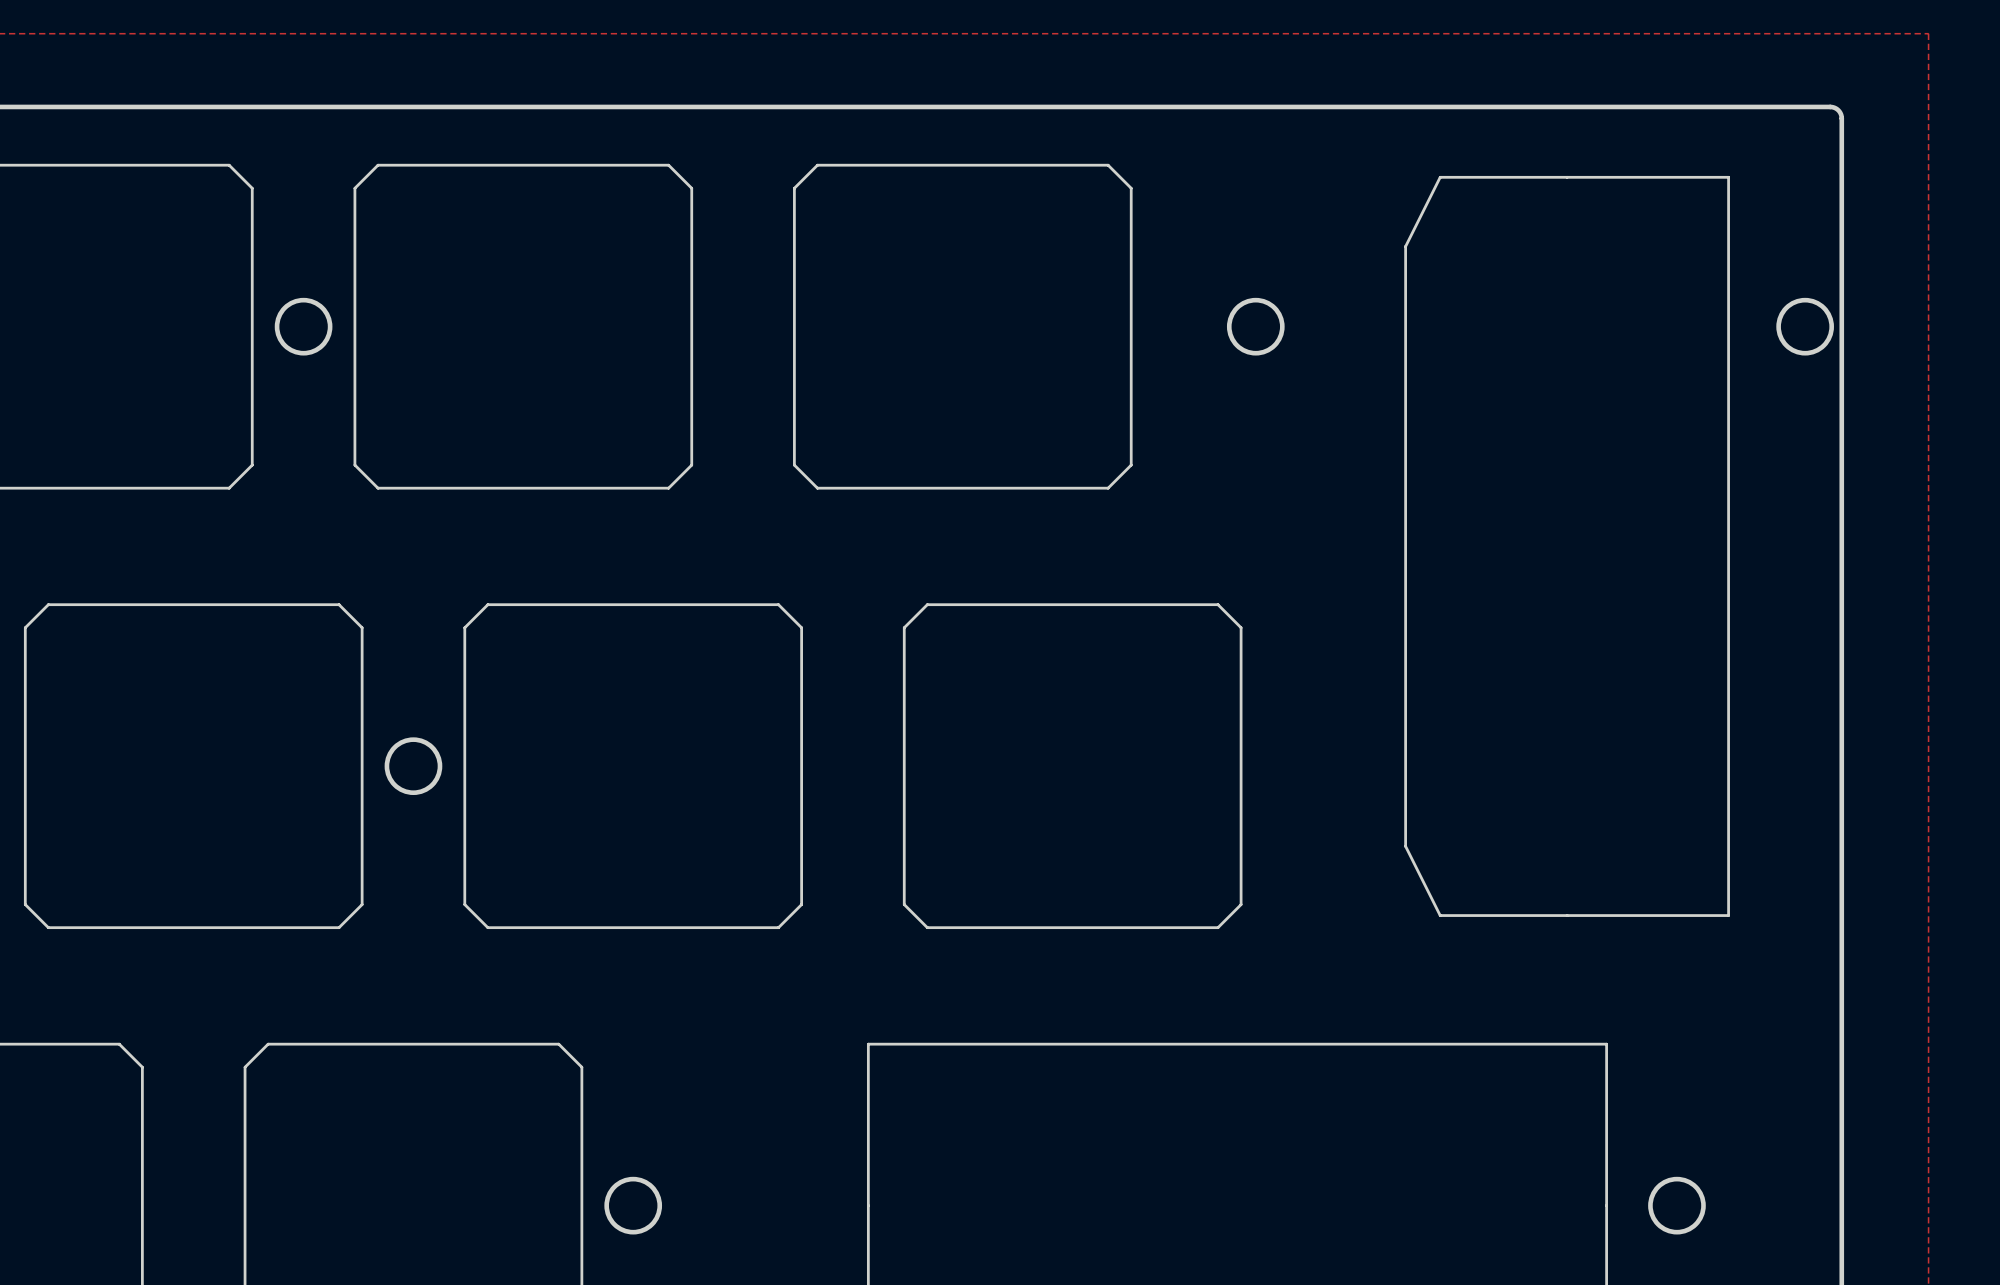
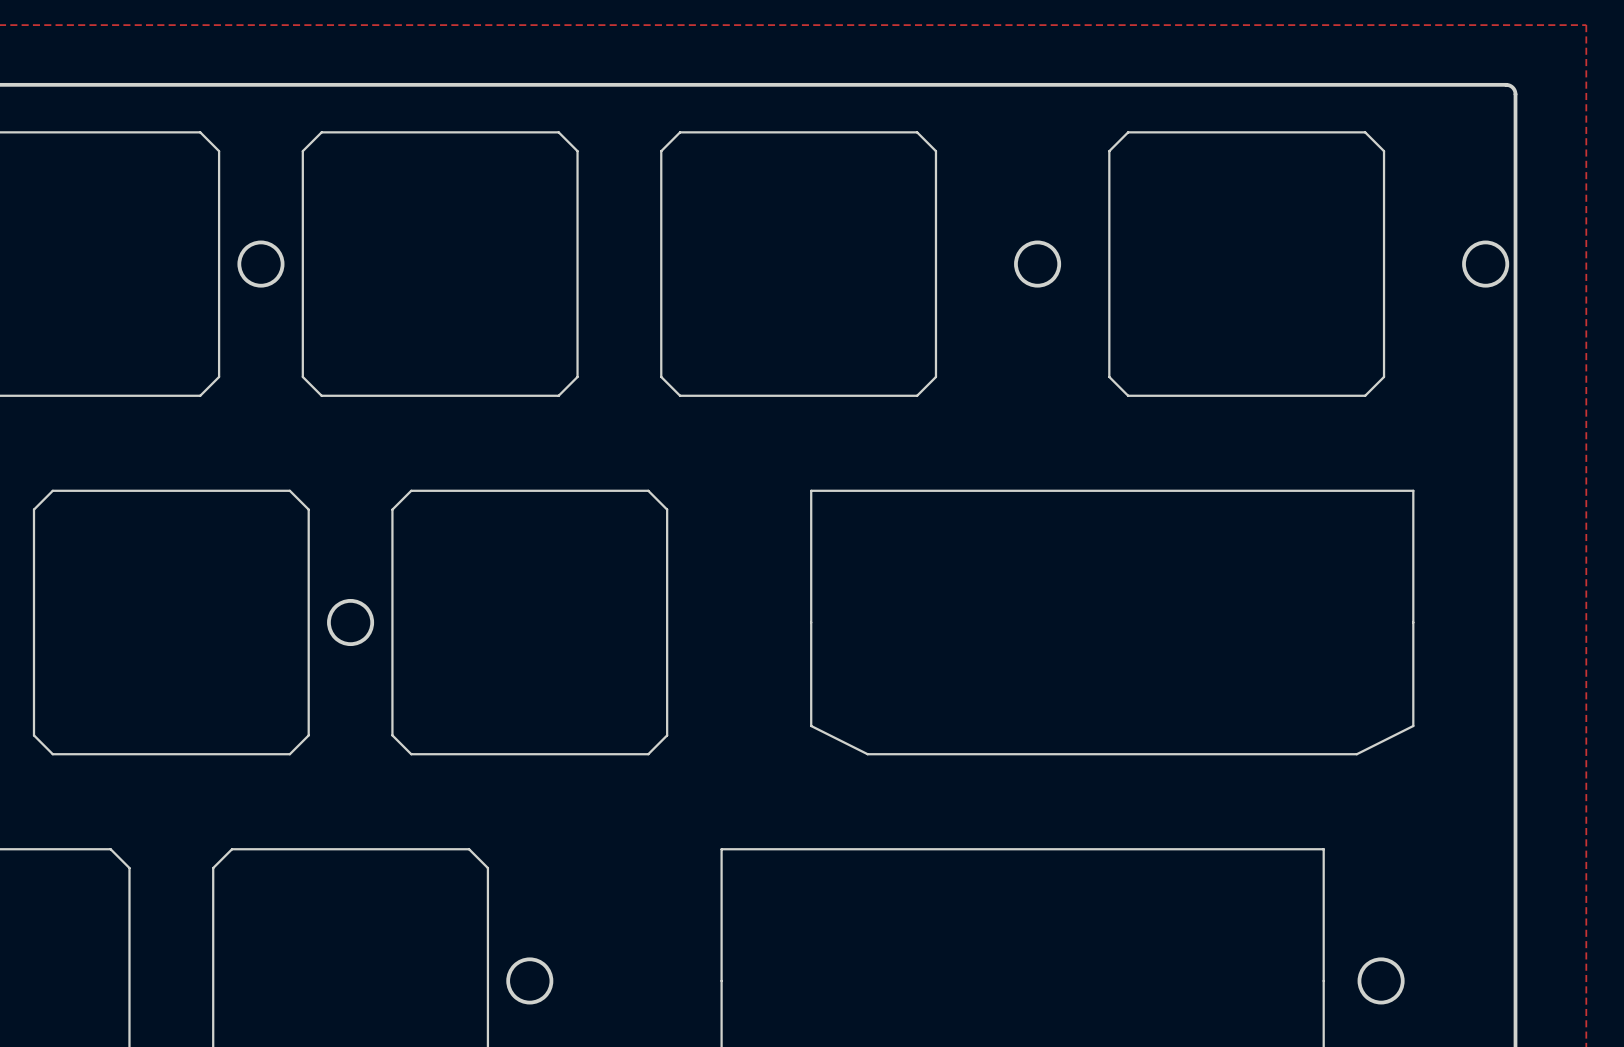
drawing: none -> [1108, 131, 1386, 397]
drawing: [1404, 175, 1730, 917] -> none
drawing: [902, 603, 1243, 930] -> none
drawing: none -> [810, 489, 1415, 756]

